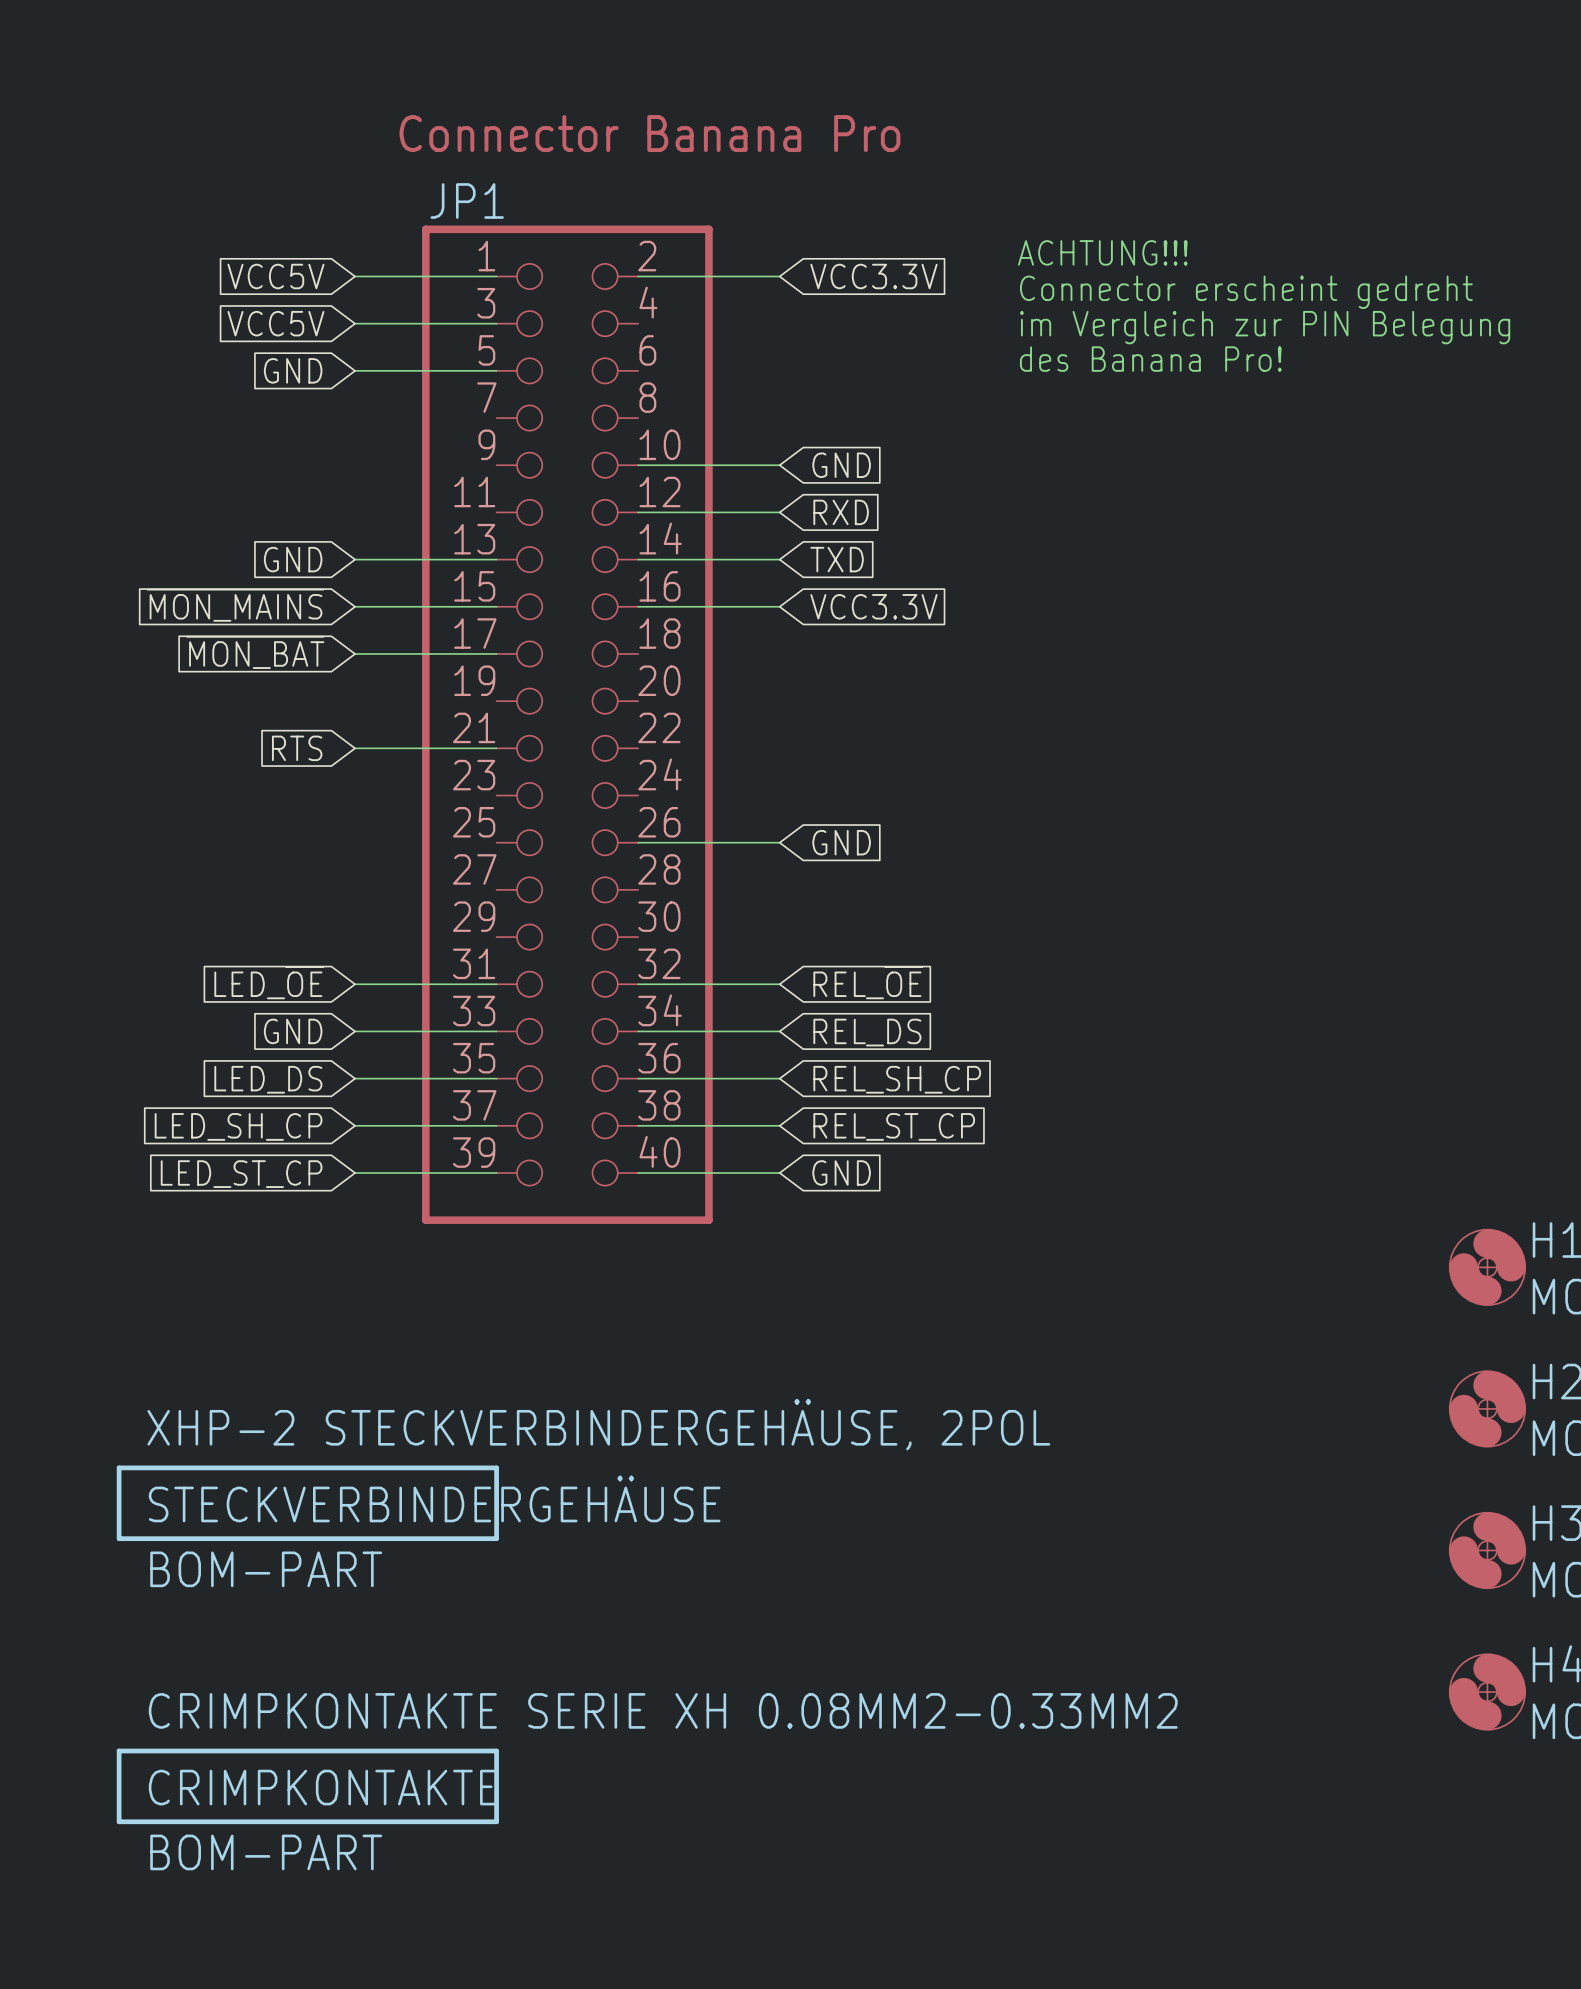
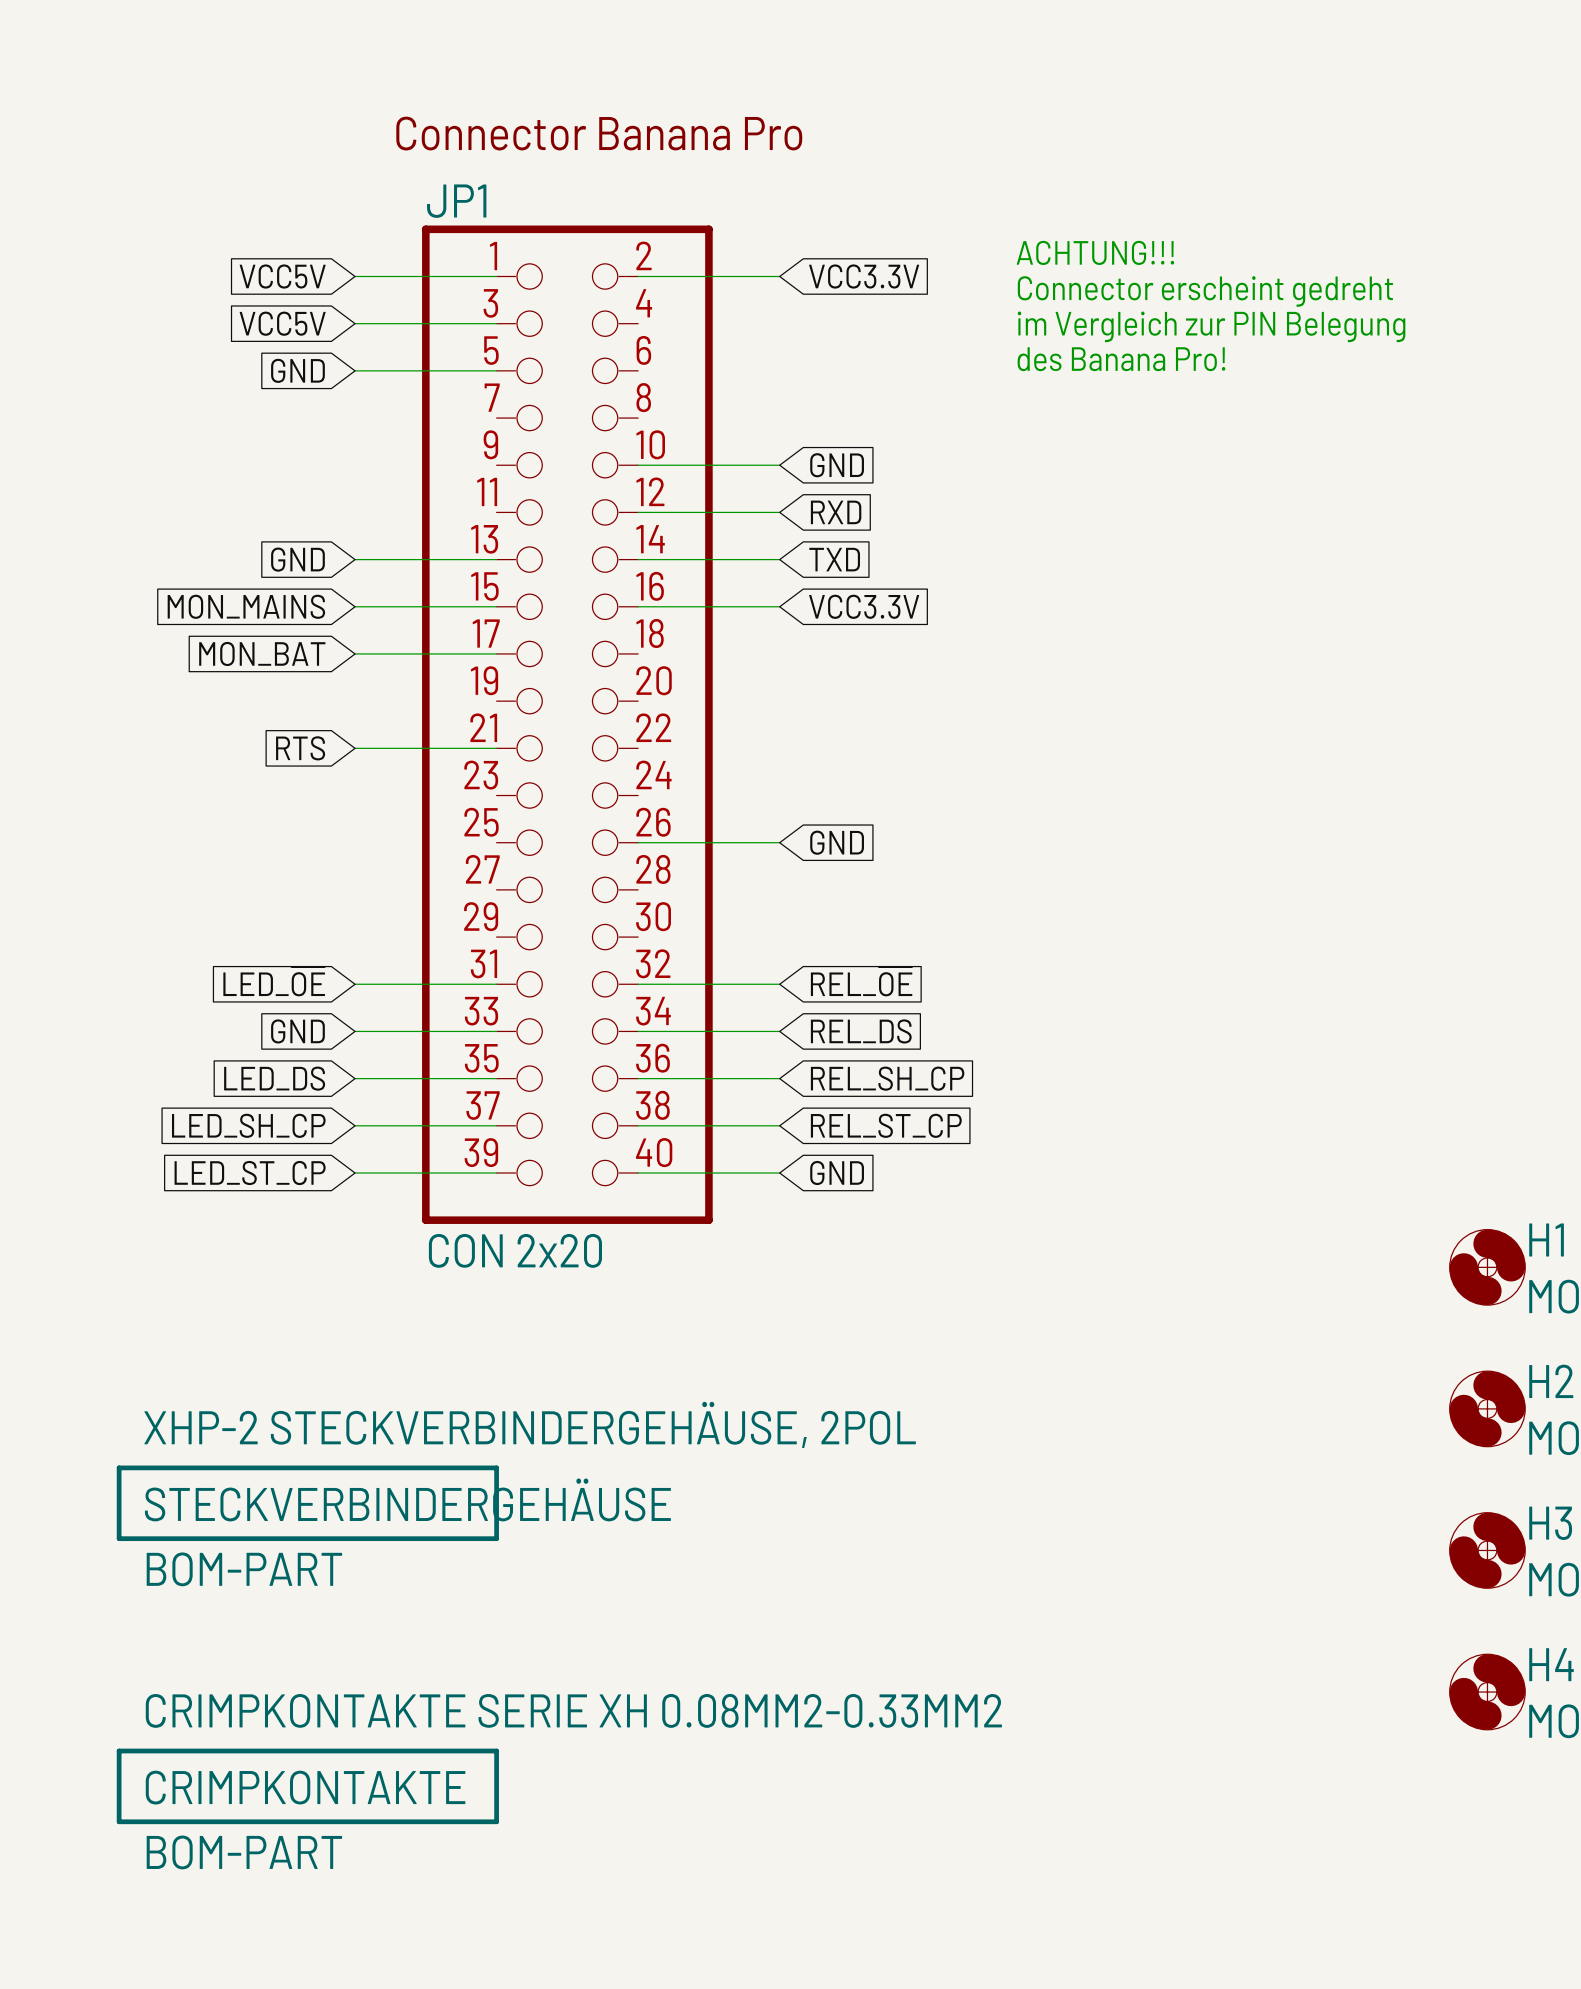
global label: ~{MON_MAINS} (235, 605) -> MON_MAINS (246, 606)
global label: ~{MON_BAT} (255, 652) -> MON_BAT (262, 653)
JP1 value: none -> CON 2x20 (515, 1250)

